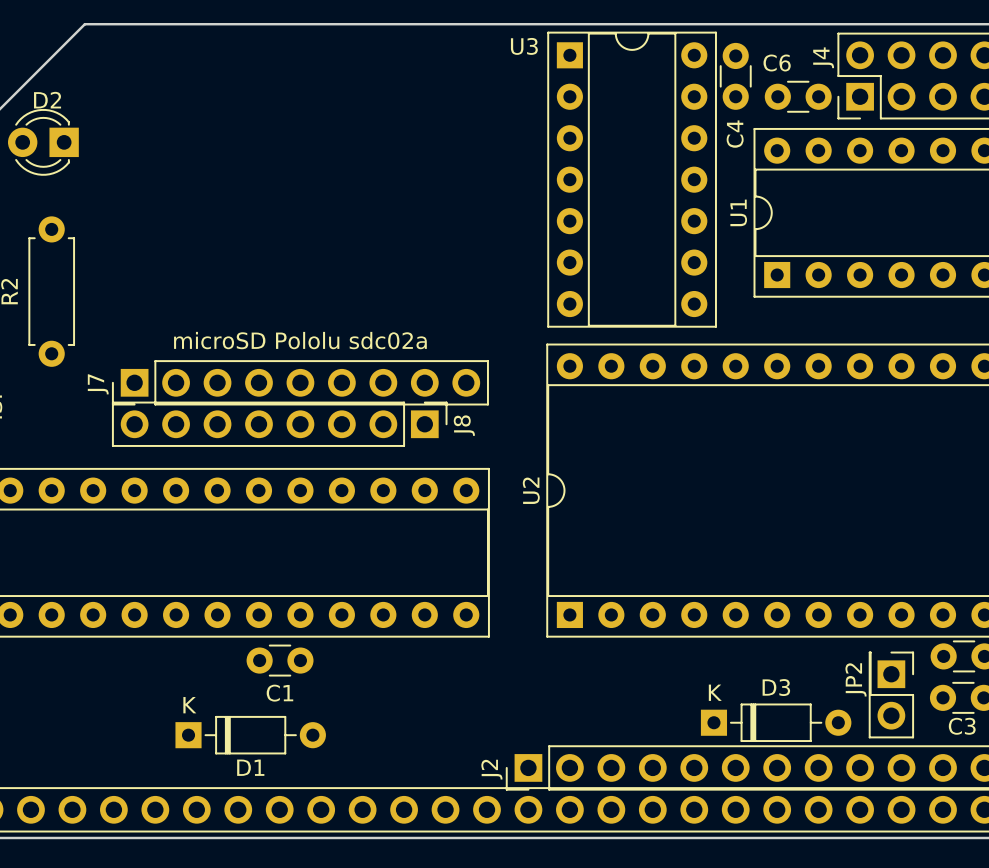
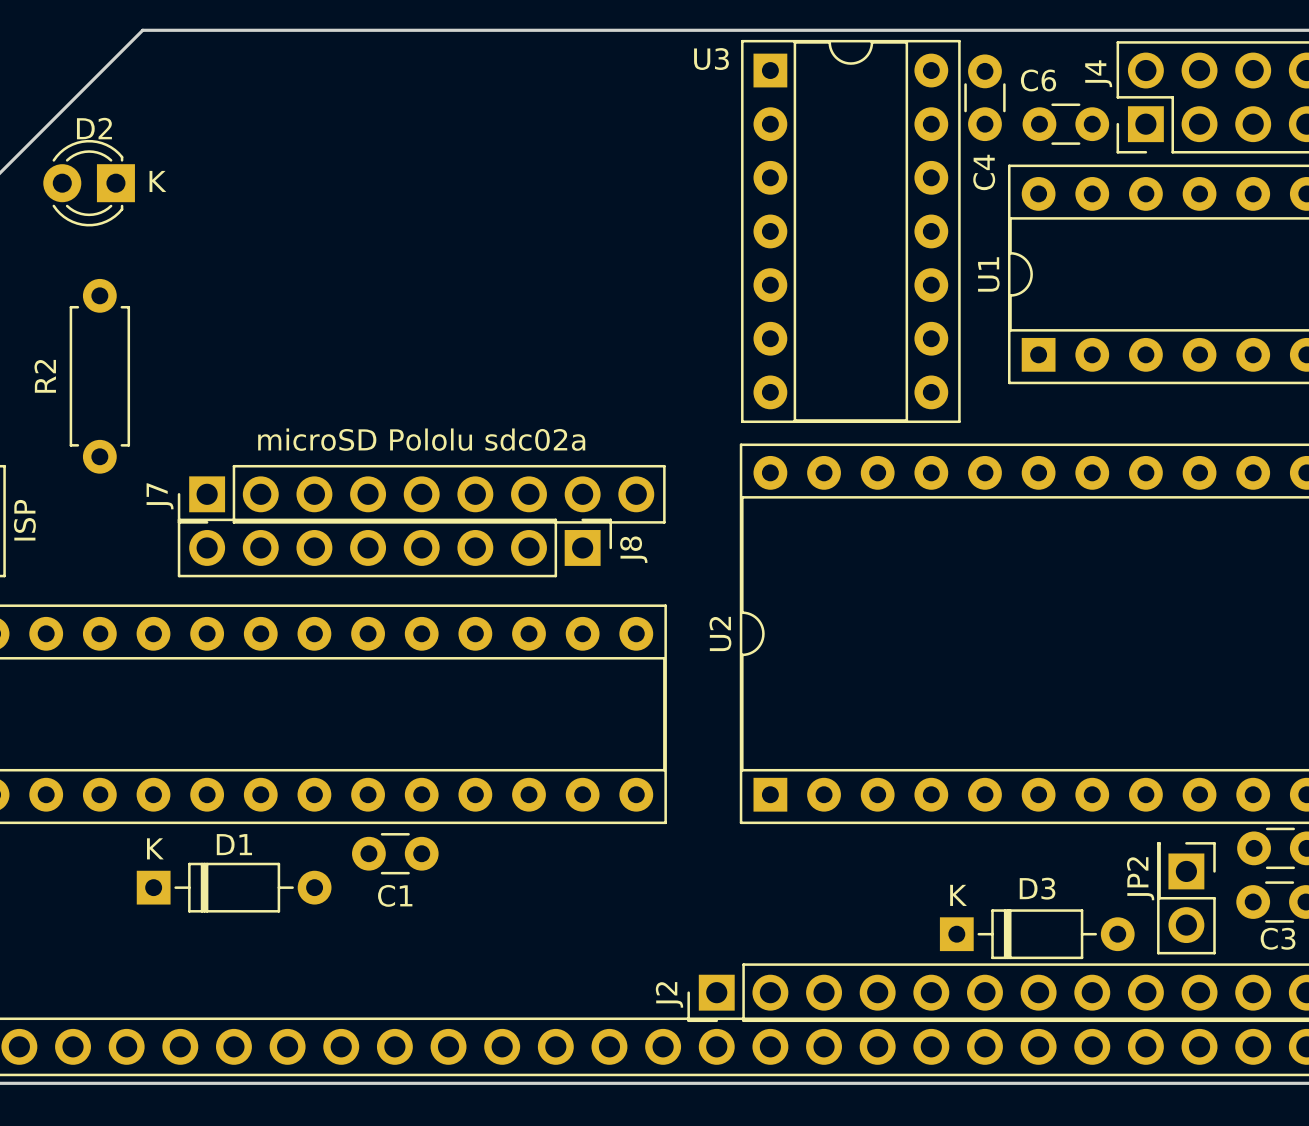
text: none -> K (157, 181)
D1 position: (250, 735) -> (234, 887)
D1 name position: D1 (250, 767) -> D1 (234, 844)

